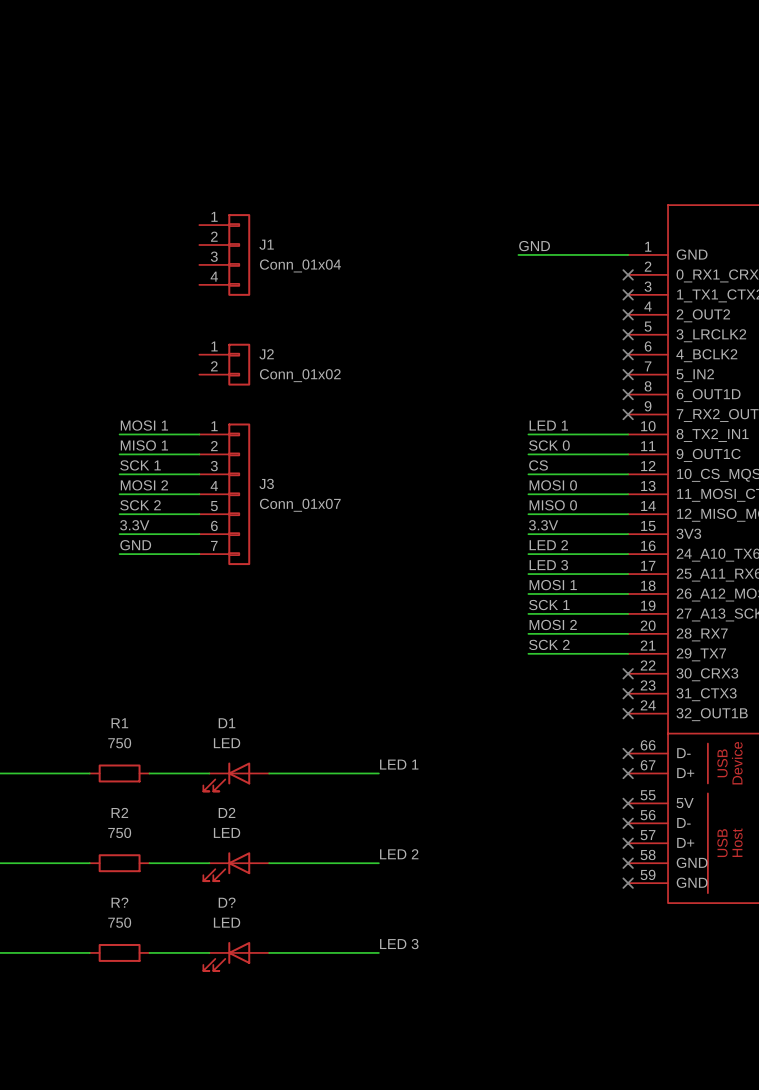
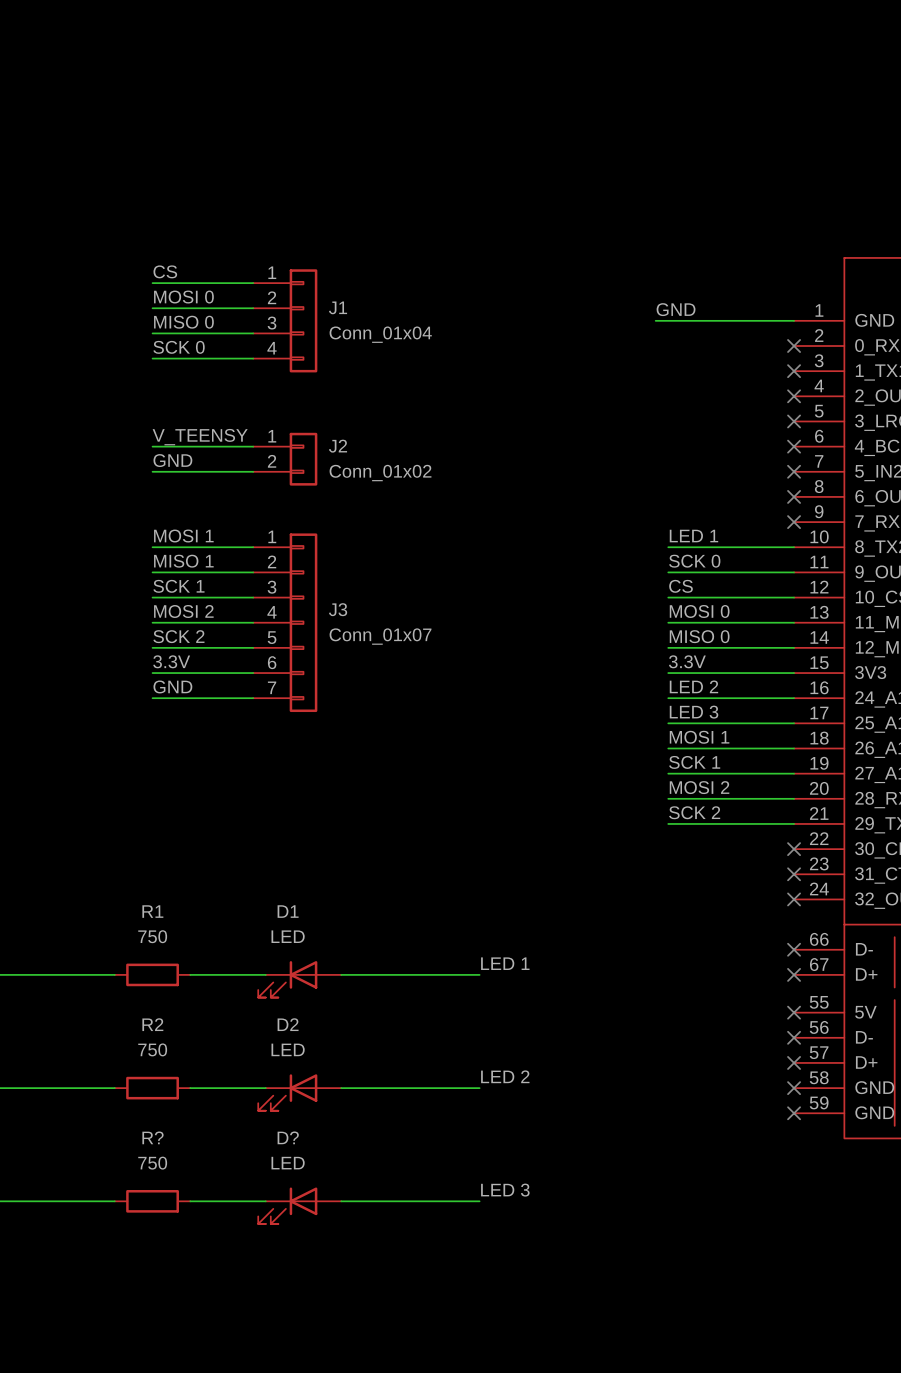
label: none -> CS (165, 271)
wire: none -> (152, 283) (253, 283)
label: none -> MOSI 0 (183, 297)
wire: none -> (152, 308) (253, 308)
label: none -> MISO 0 (183, 322)
wire: none -> (152, 333) (253, 333)
label: none -> SCK 0 (179, 347)
wire: none -> (152, 358) (253, 358)
label: none -> V_TEENSY (200, 437)
wire: none -> (152, 446) (253, 446)
label: none -> GND (172, 460)
wire: none -> (152, 471) (253, 471)

